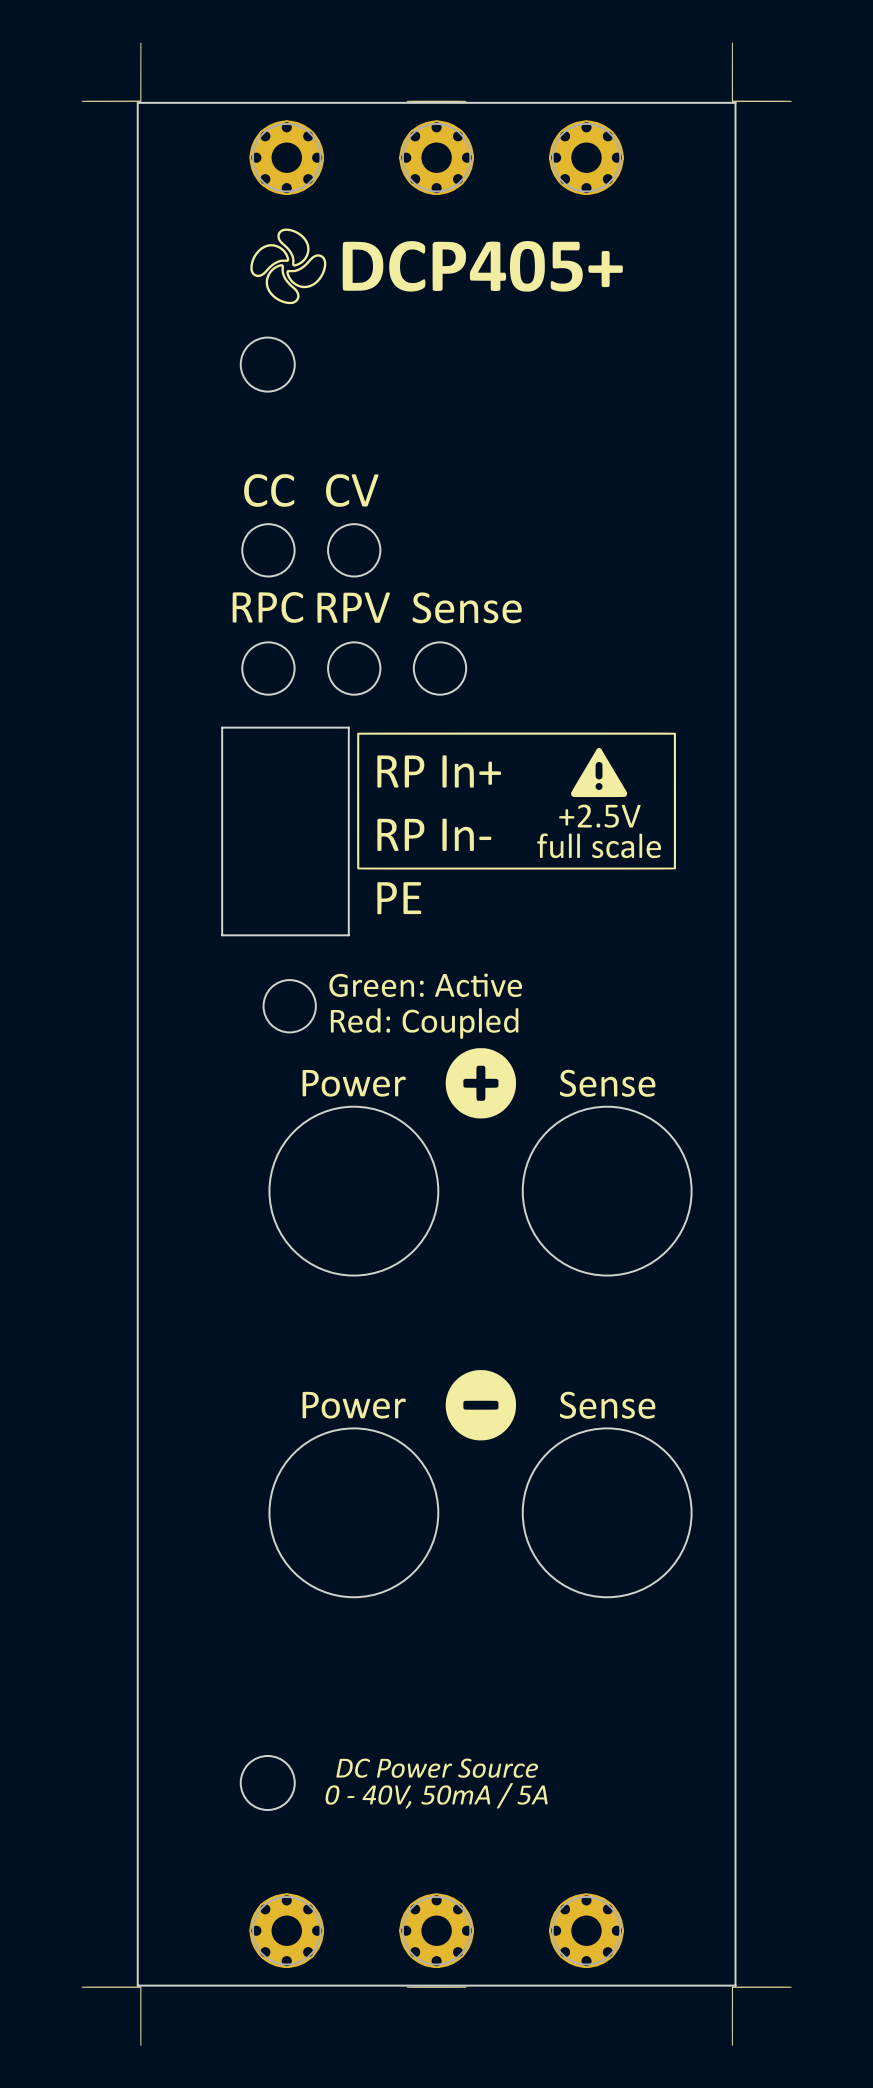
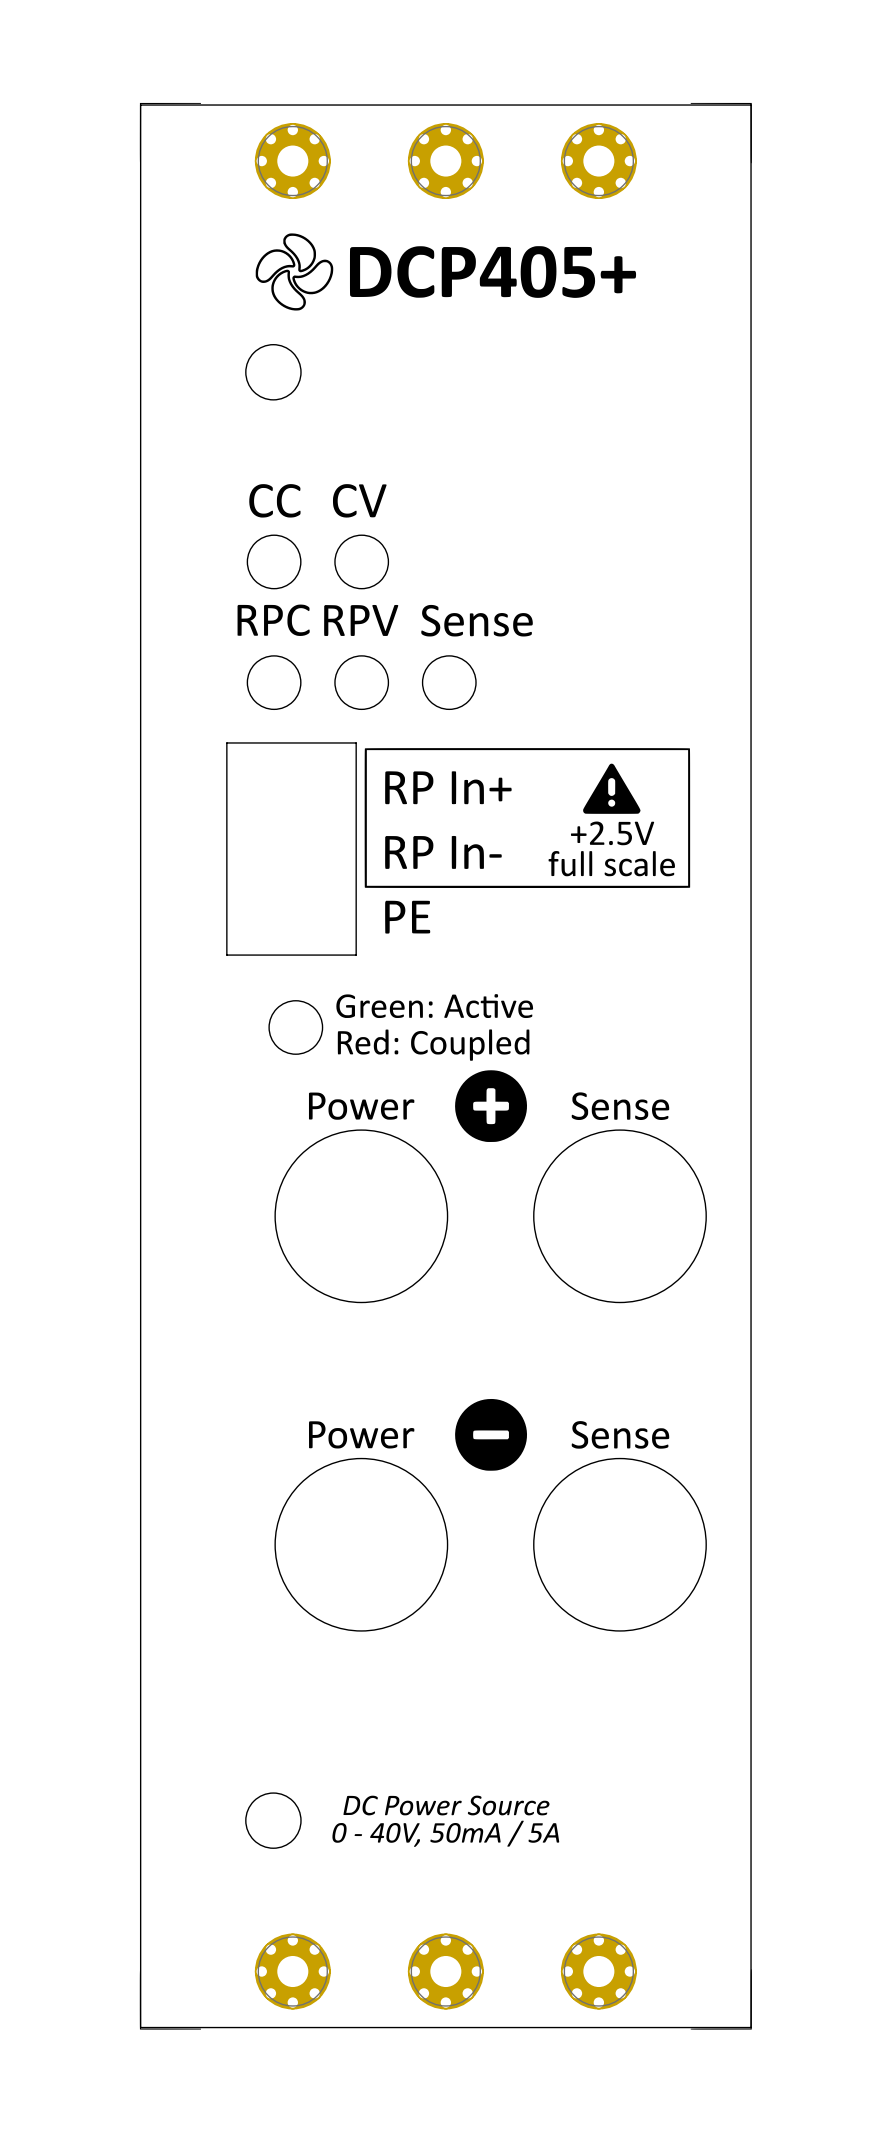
drawing shape: [81, 42, 792, 2046] -> [139, 102, 752, 2030]

